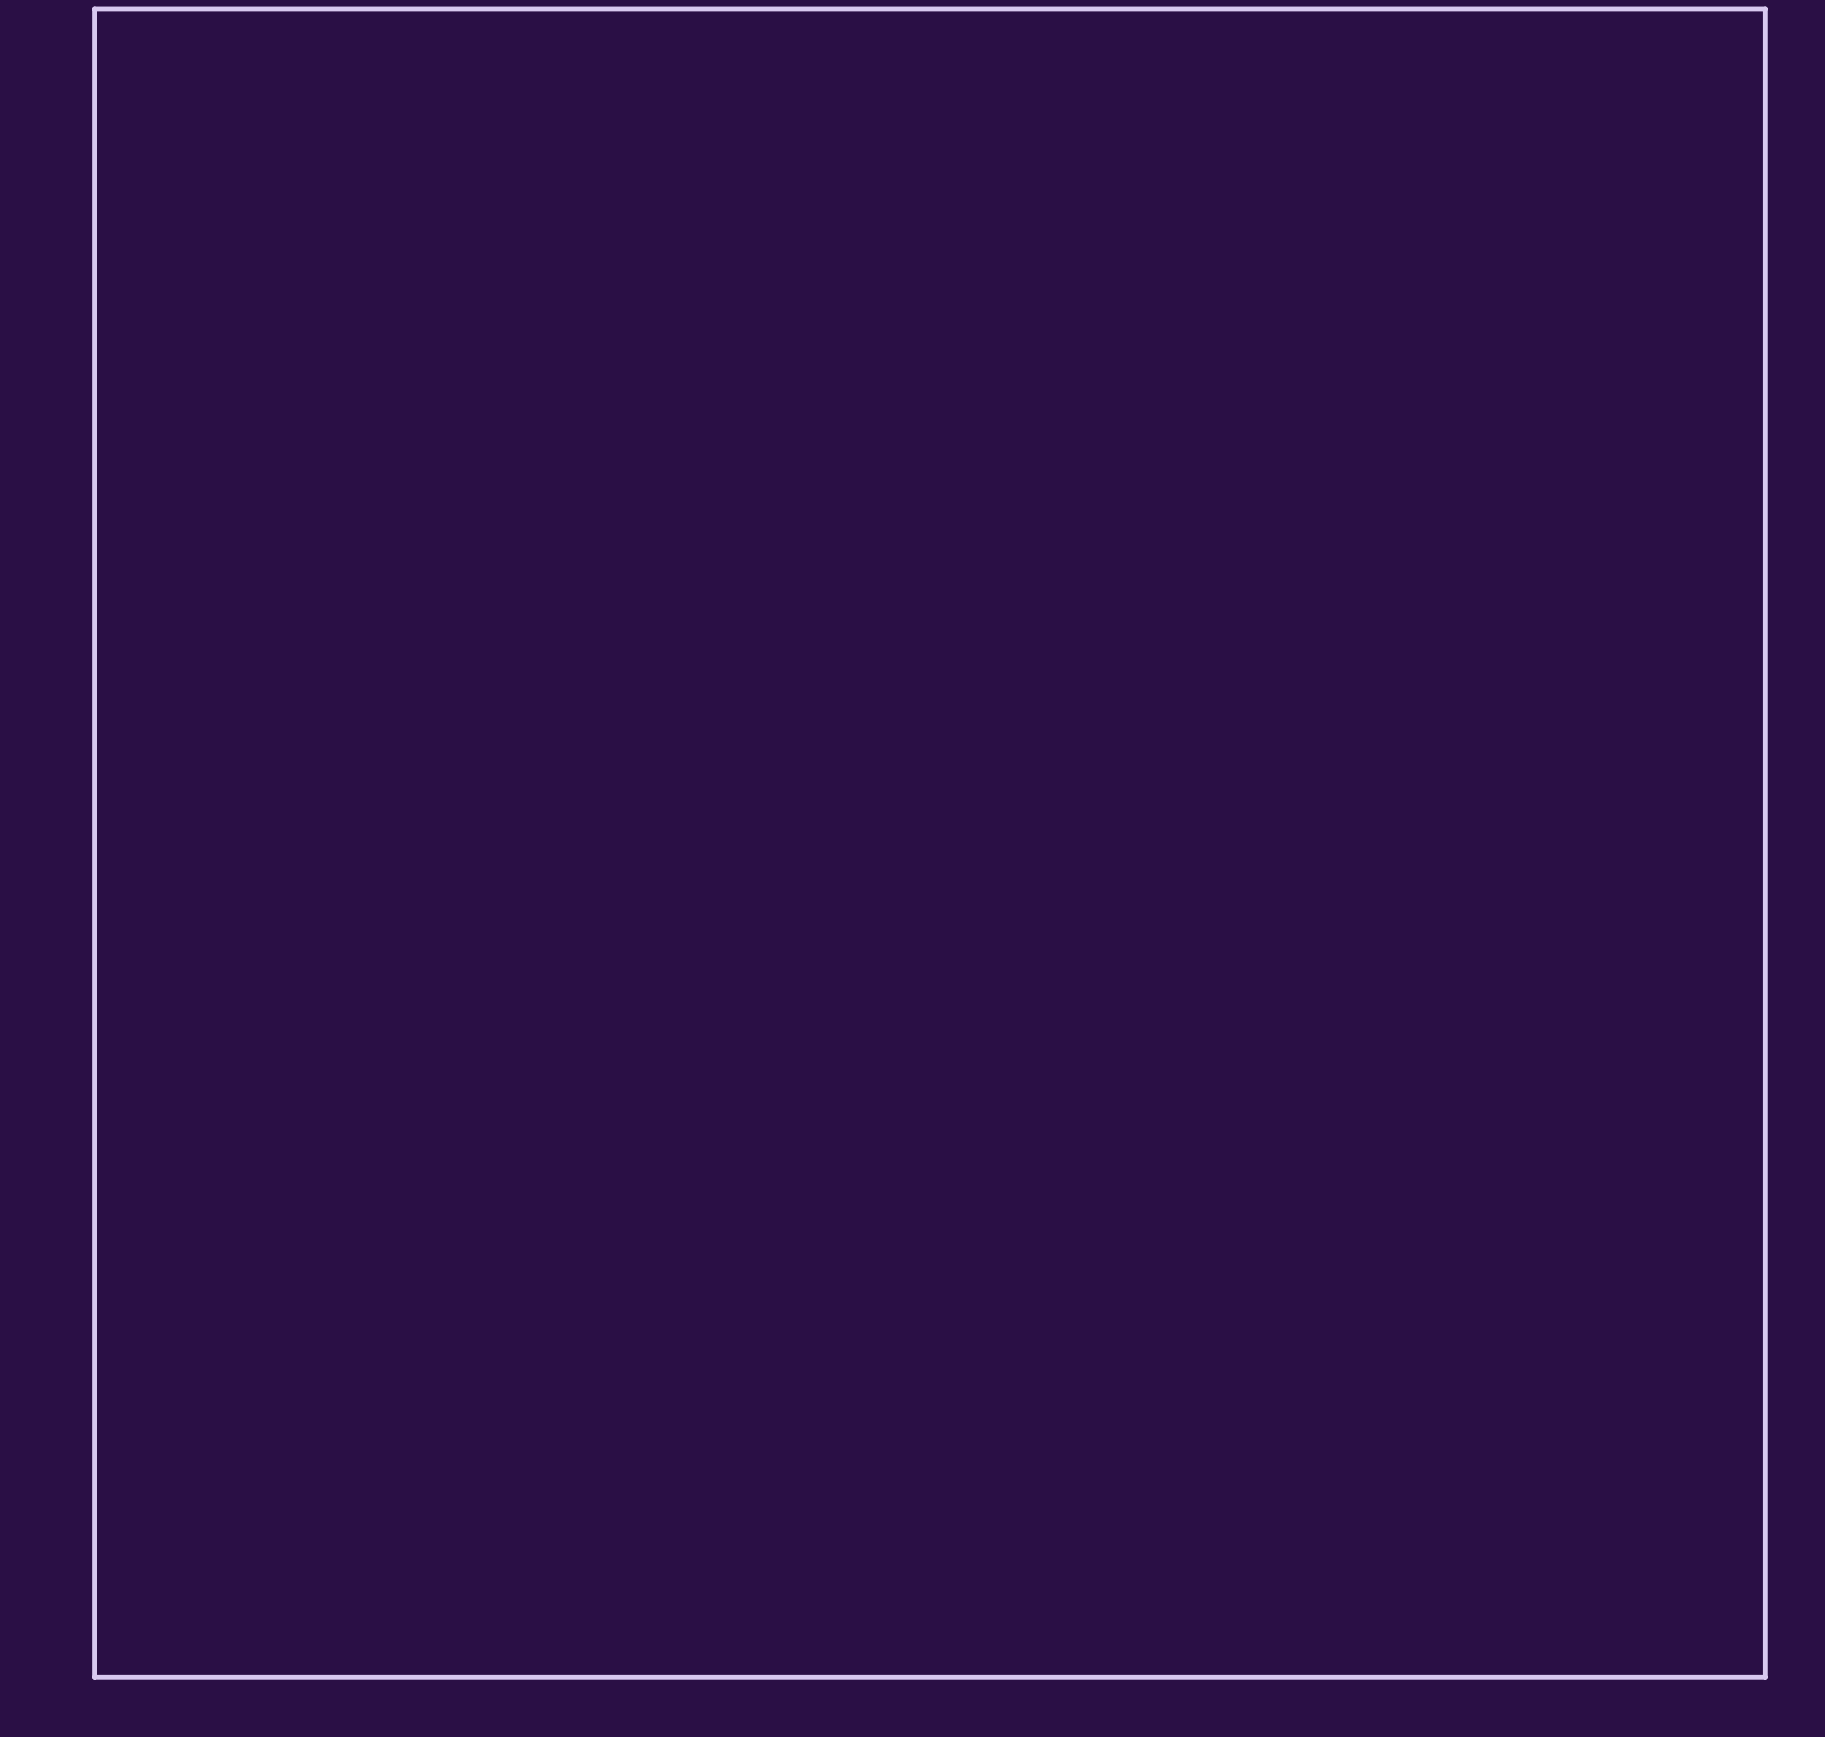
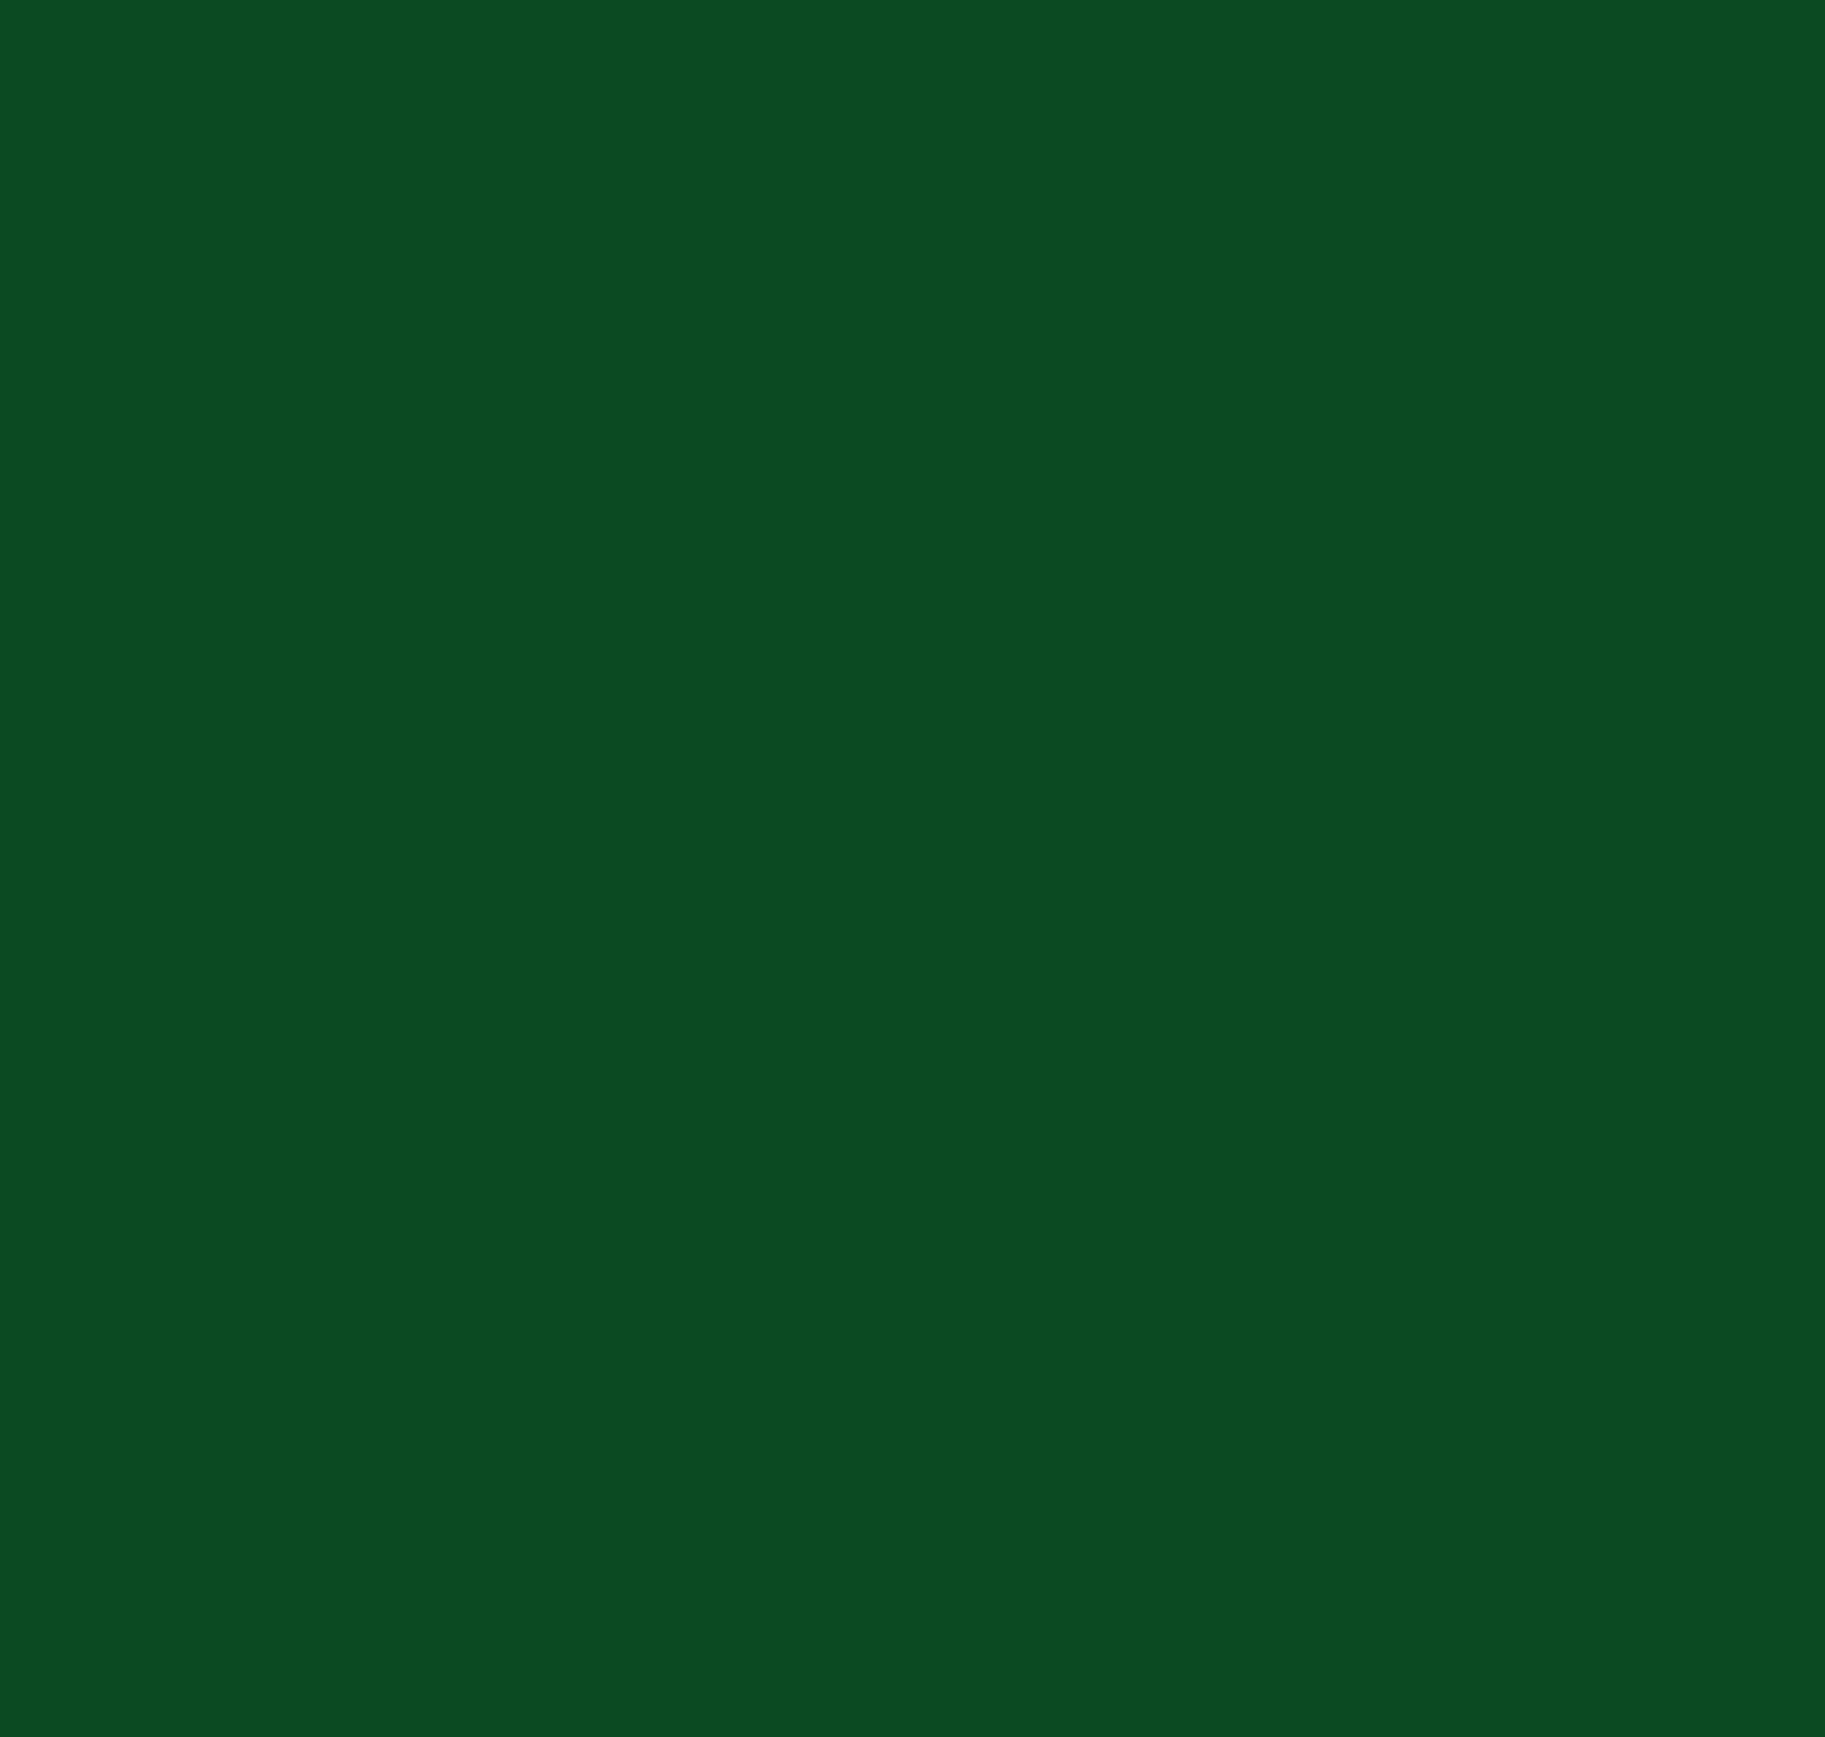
drawing: [92, 6, 1768, 1680] -> none

